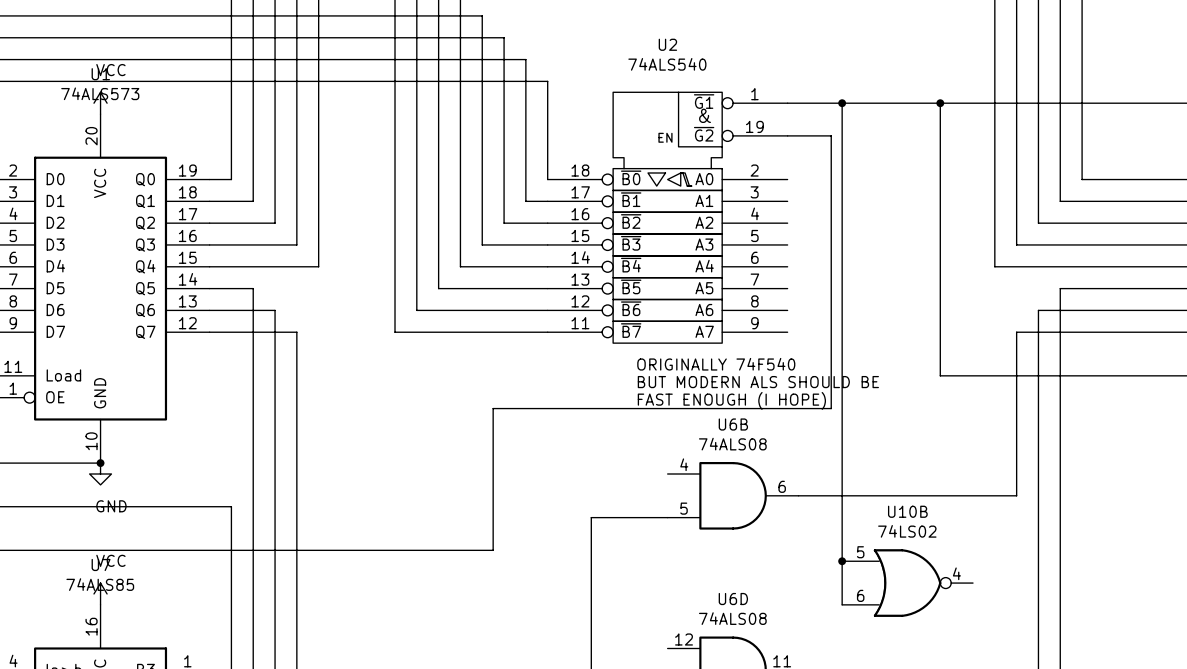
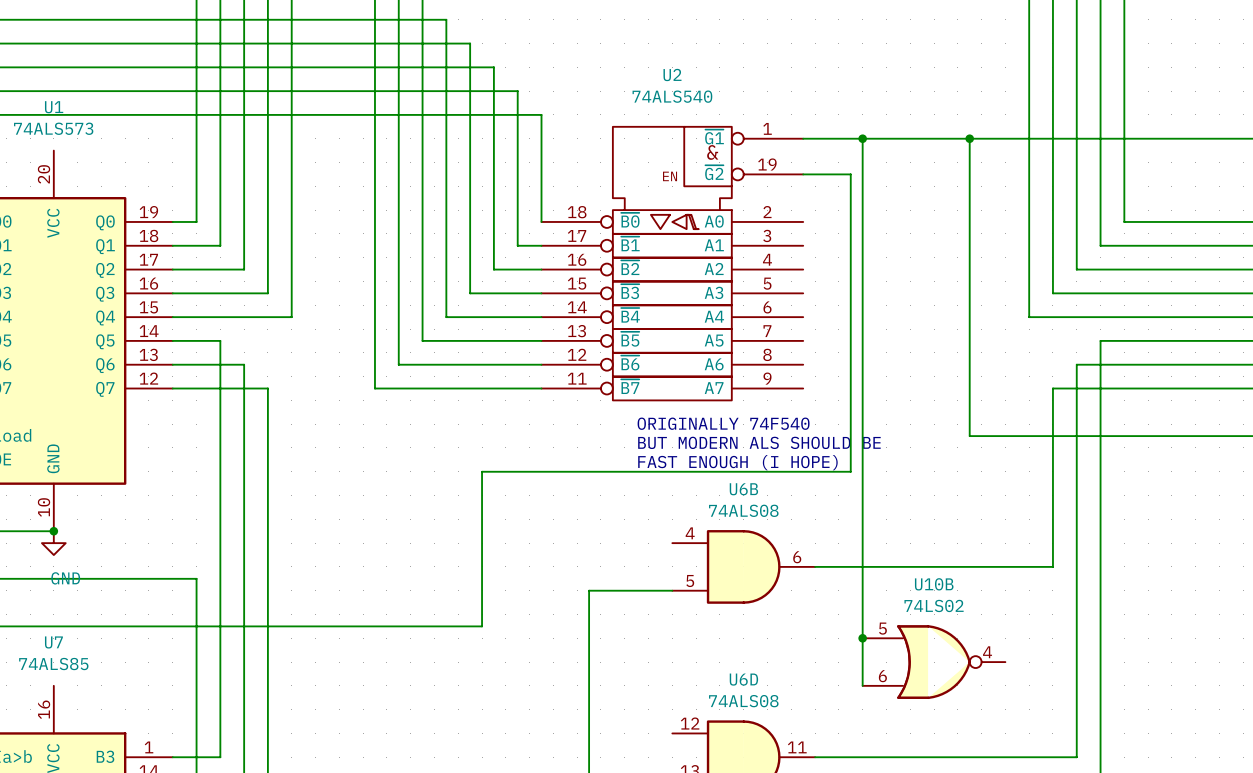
power symbol: VCC (100, 103) -> none
power symbol: VCC (100, 593) -> none

